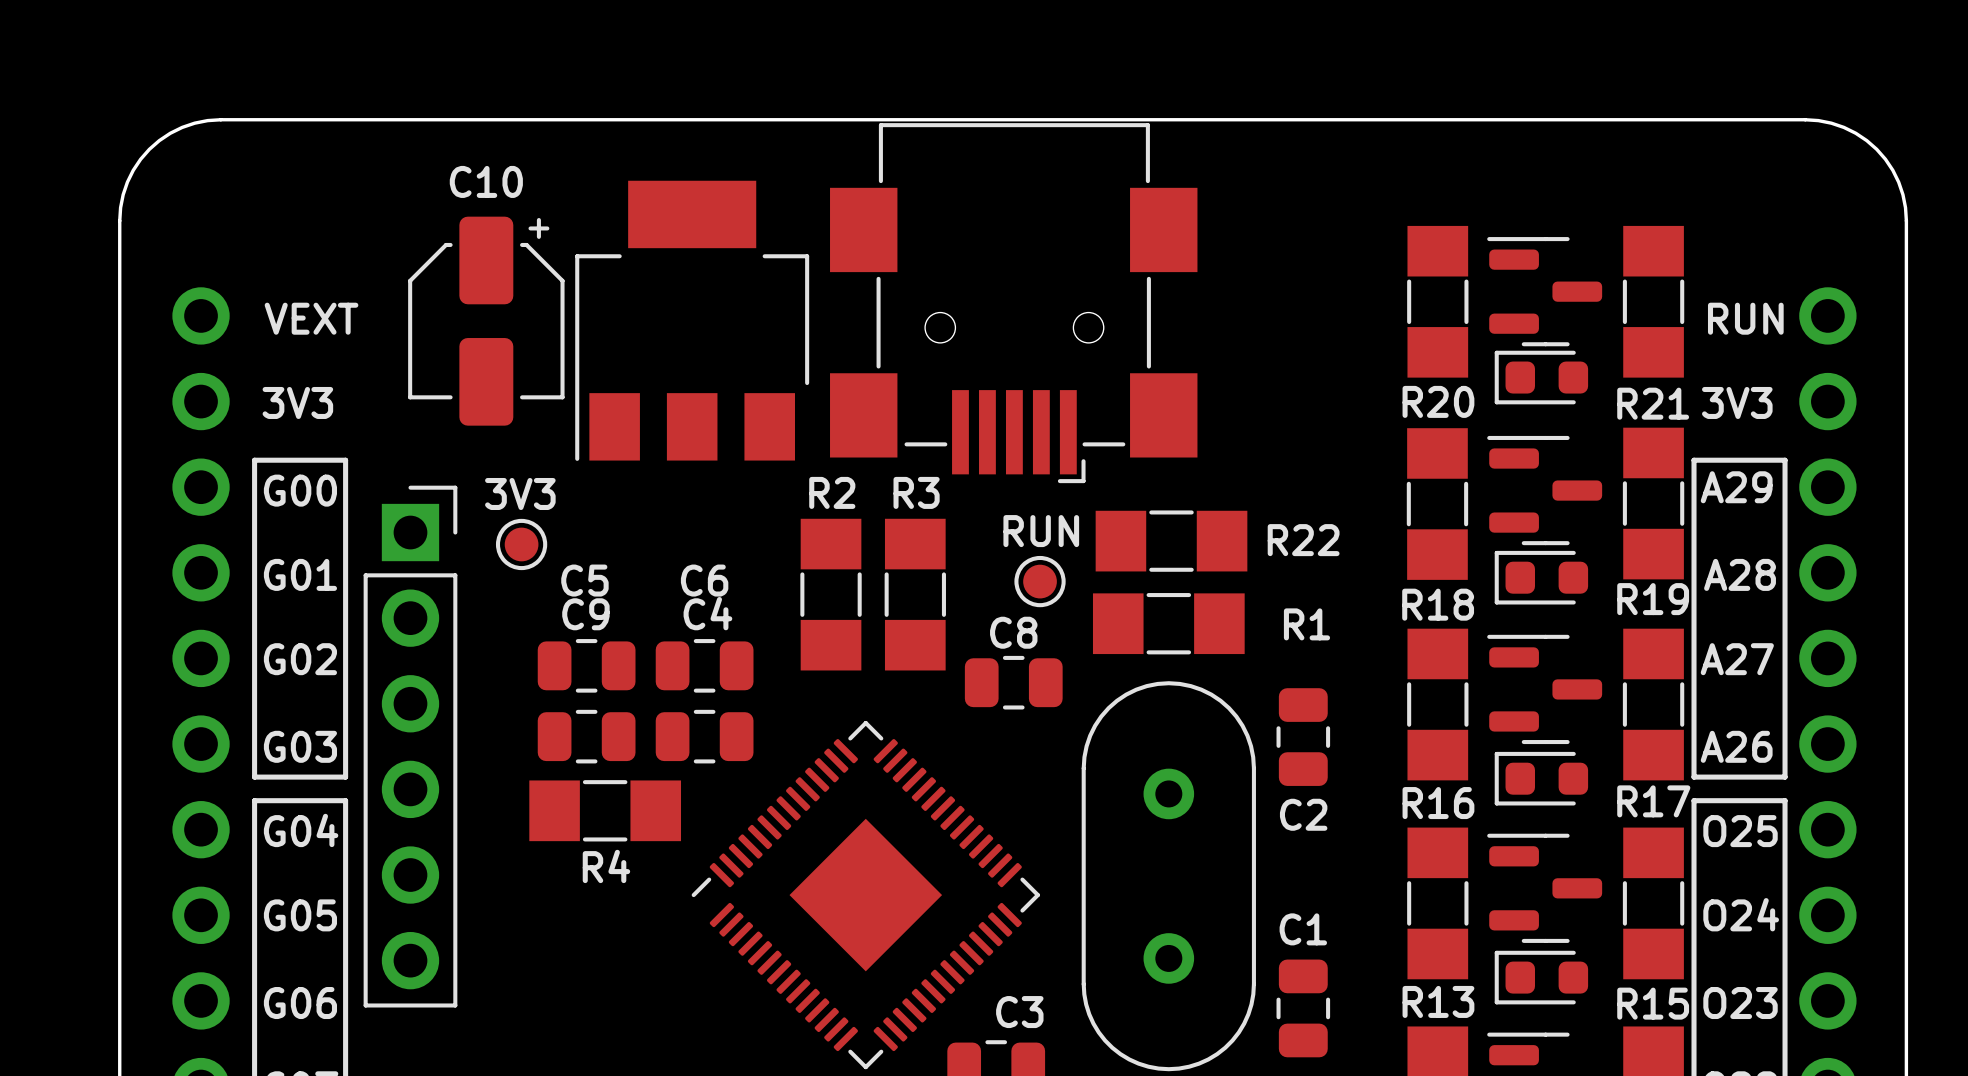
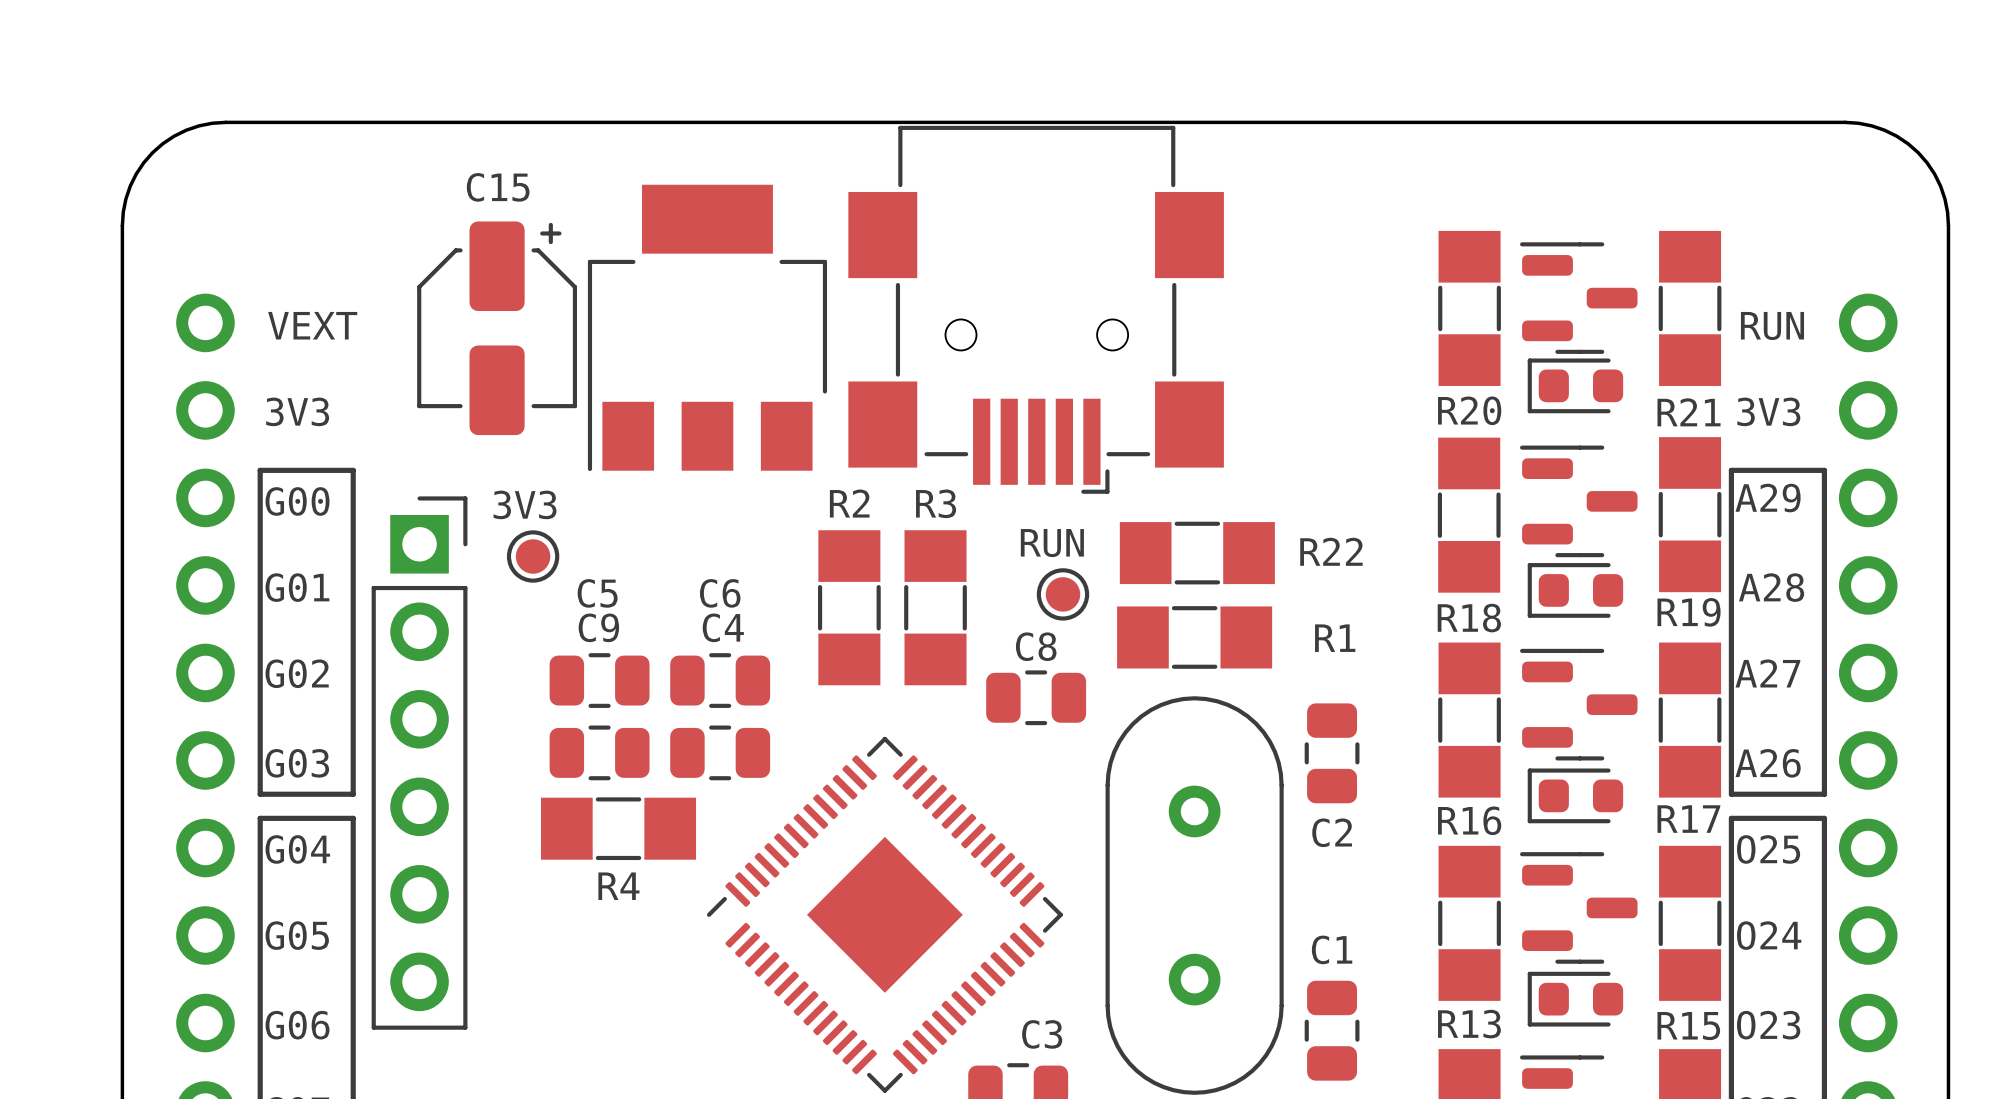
C10 name: C10 (486, 181) -> C15 (498, 187)

